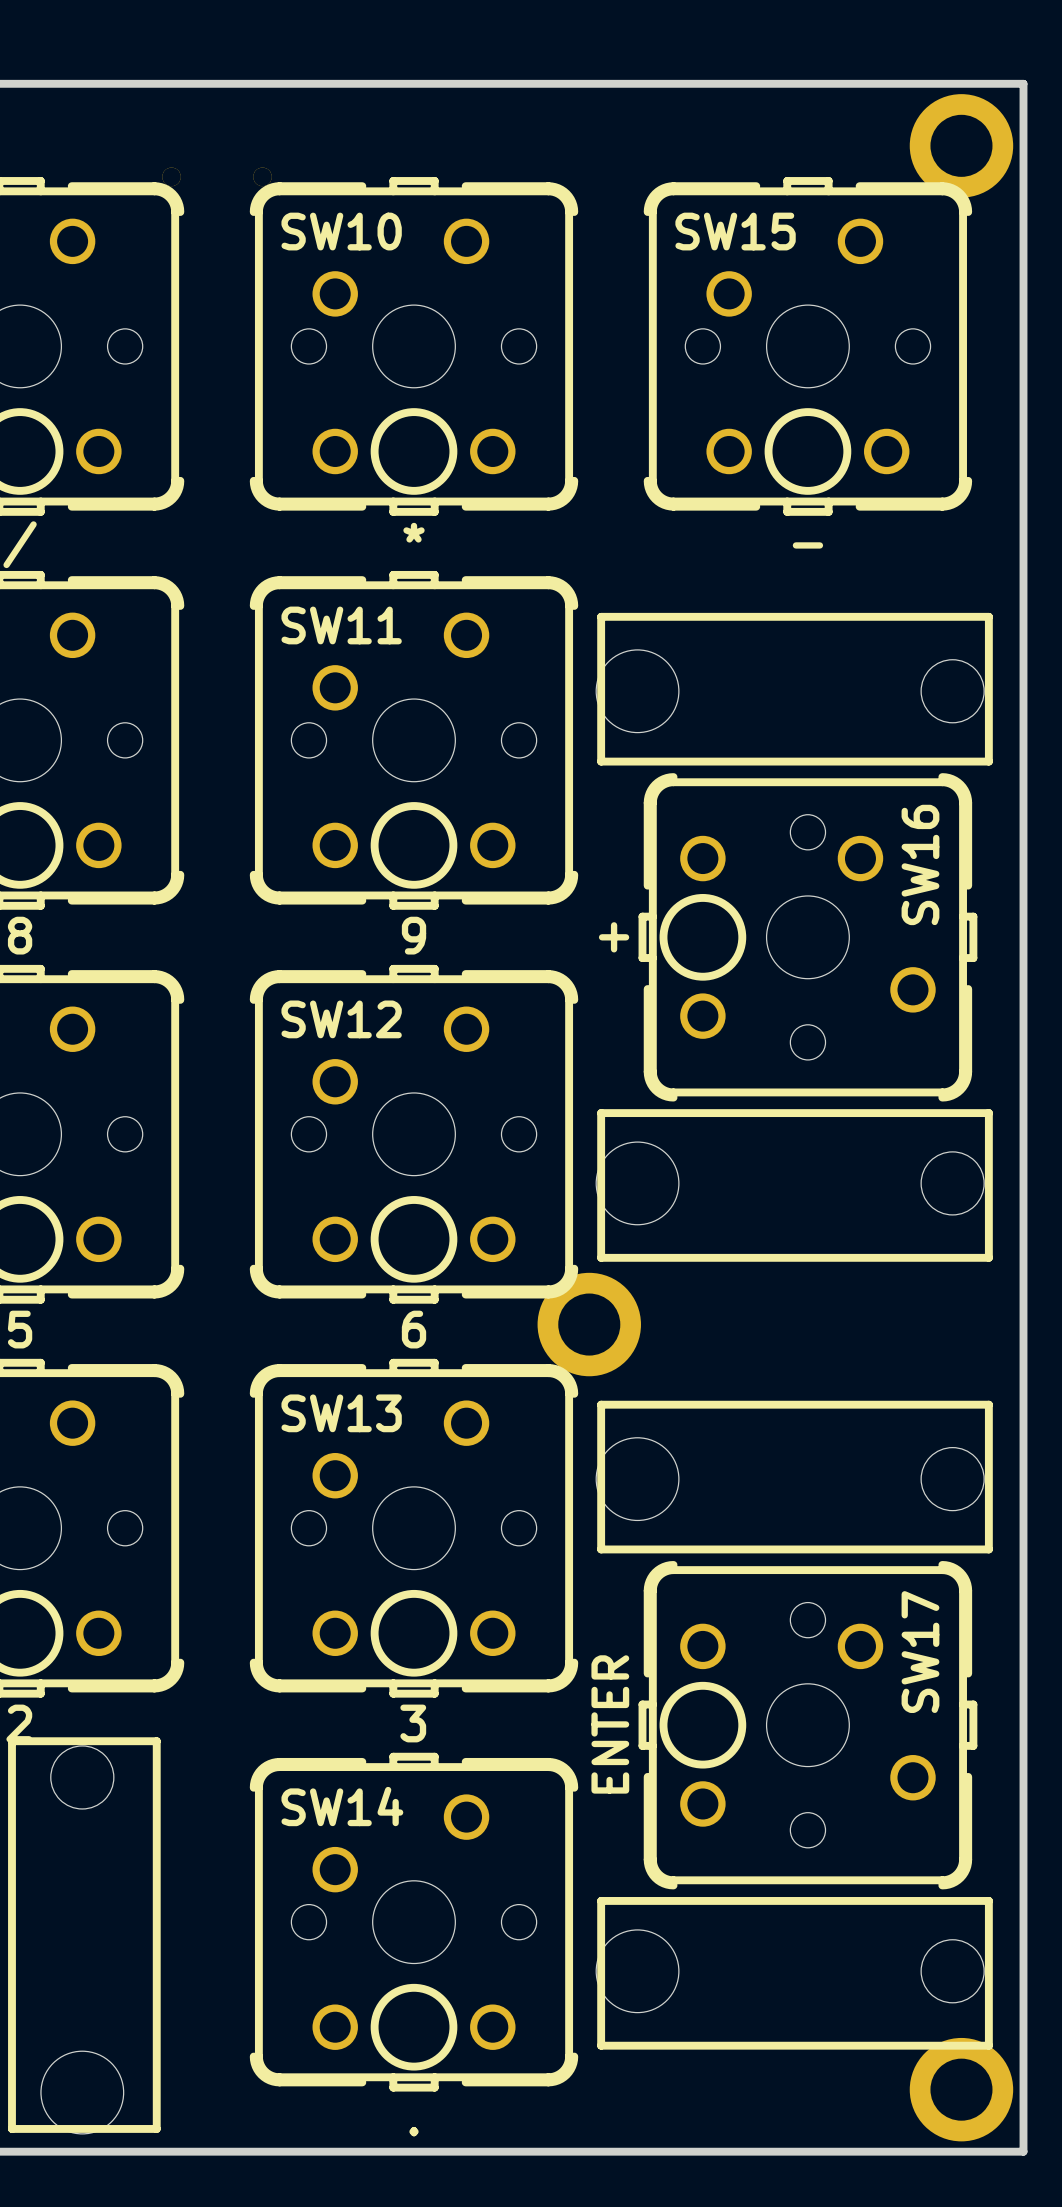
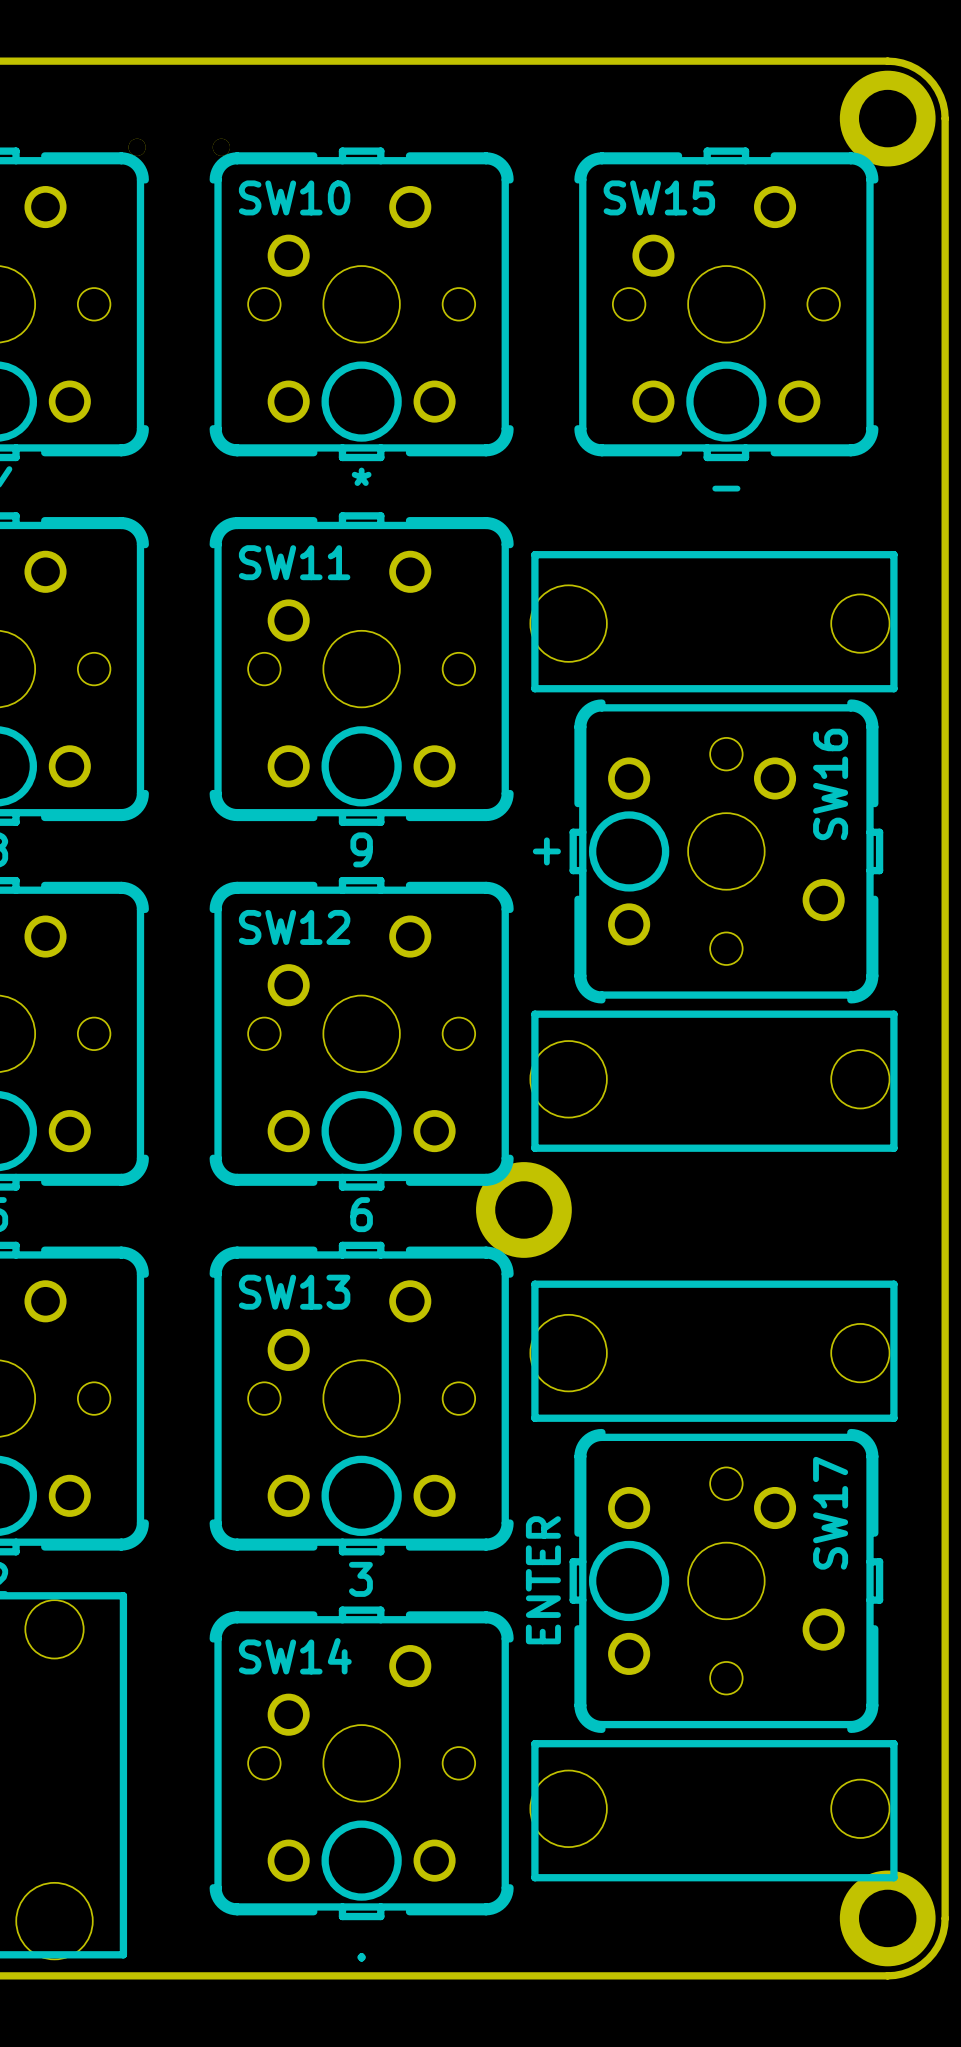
board edge: (982, 83) (1023, 83) (1023, 2151) (982, 2151) -> (887, 61) (909, 65) (928, 77) (940, 96) (945, 118) (945, 1918) (940, 1940) (928, 1959) (909, 1971) (887, 1975)
part position: (961, 145) -> (887, 118)
part position: (961, 2089) -> (887, 1918)

